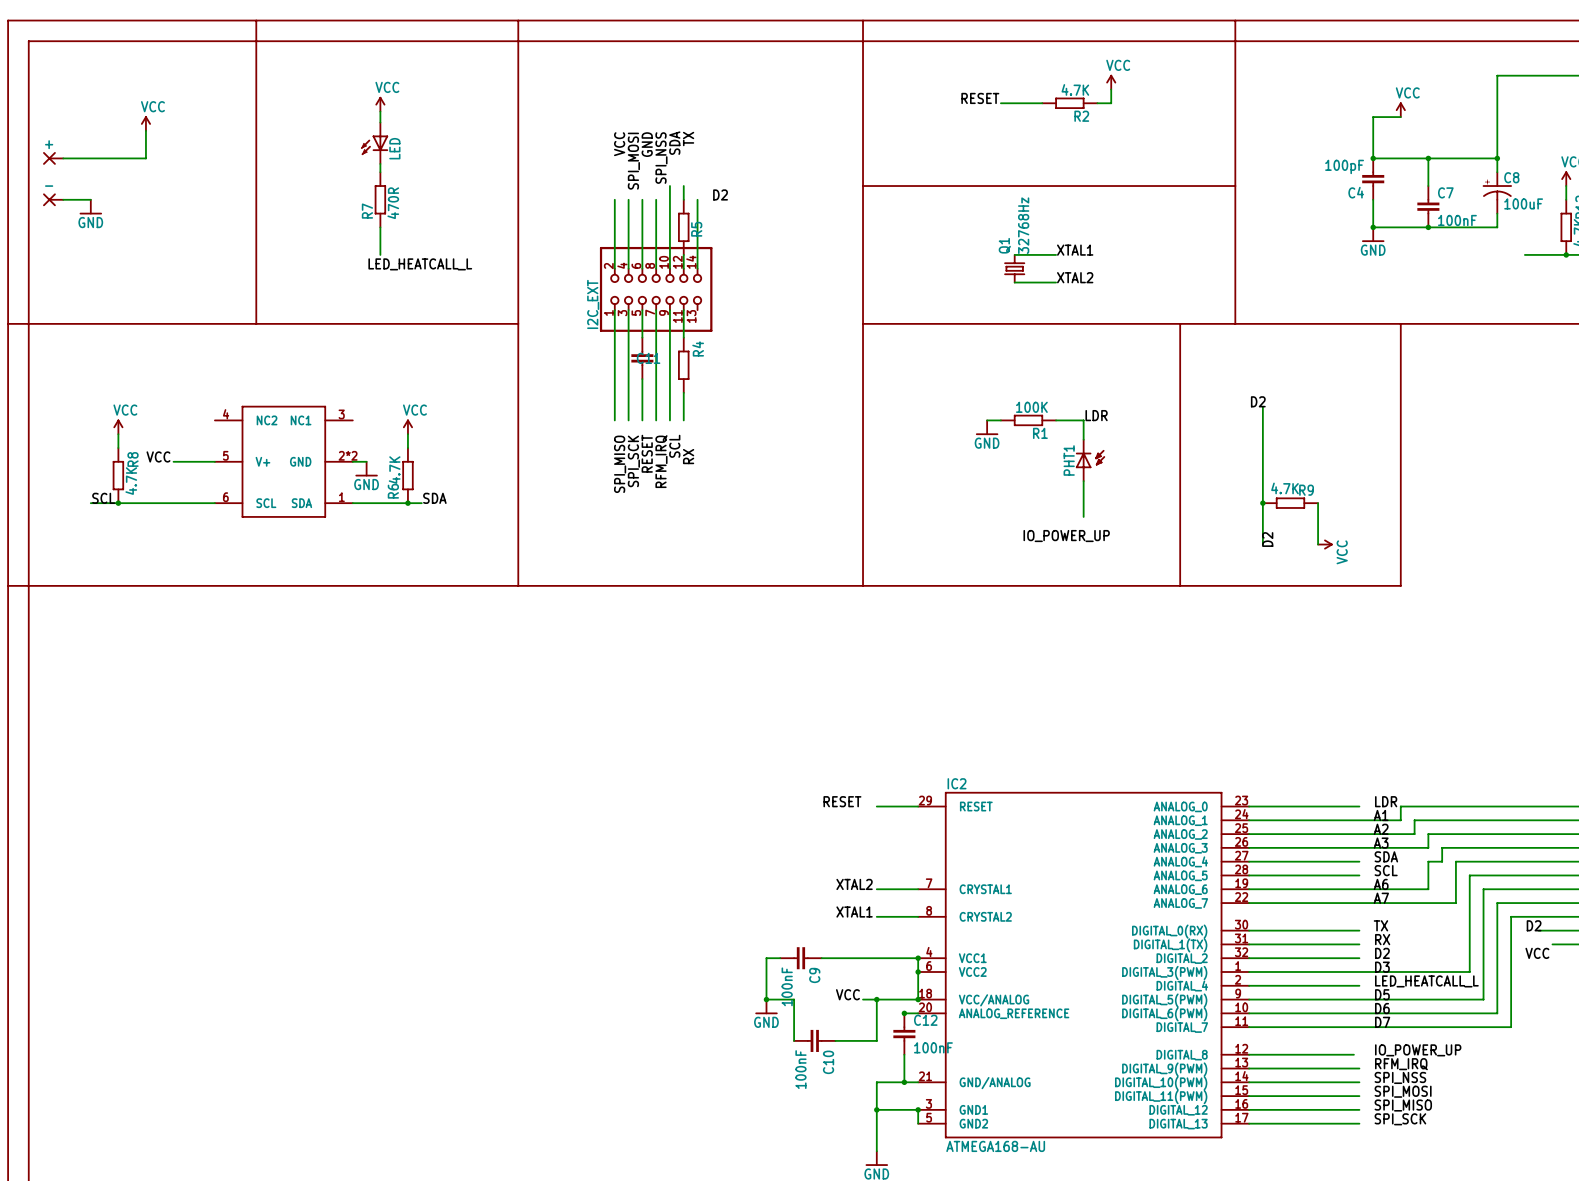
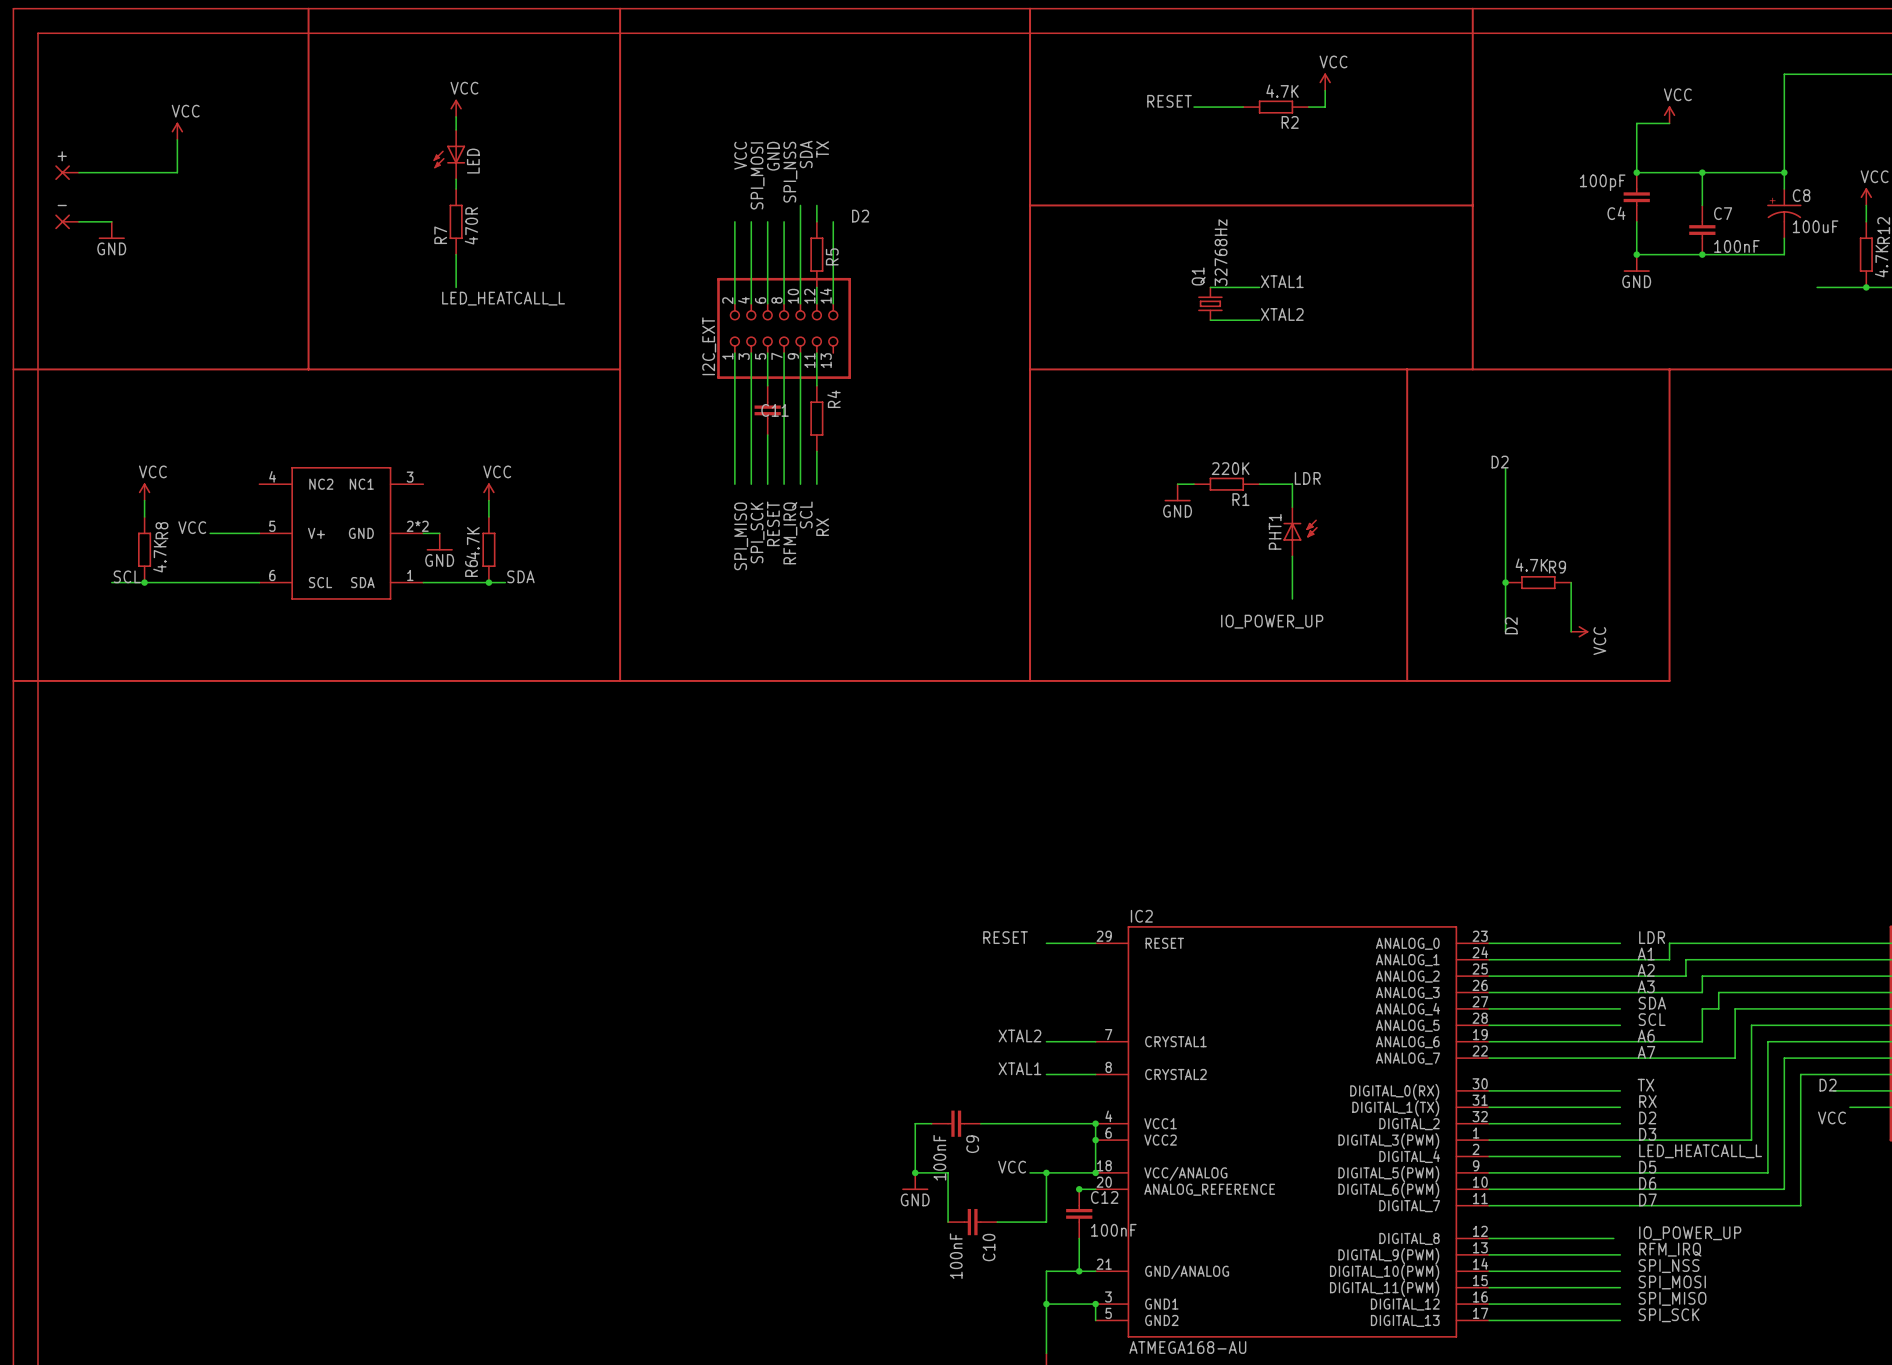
R1 value: 100K (1031, 407) -> 220K (1230, 468)

